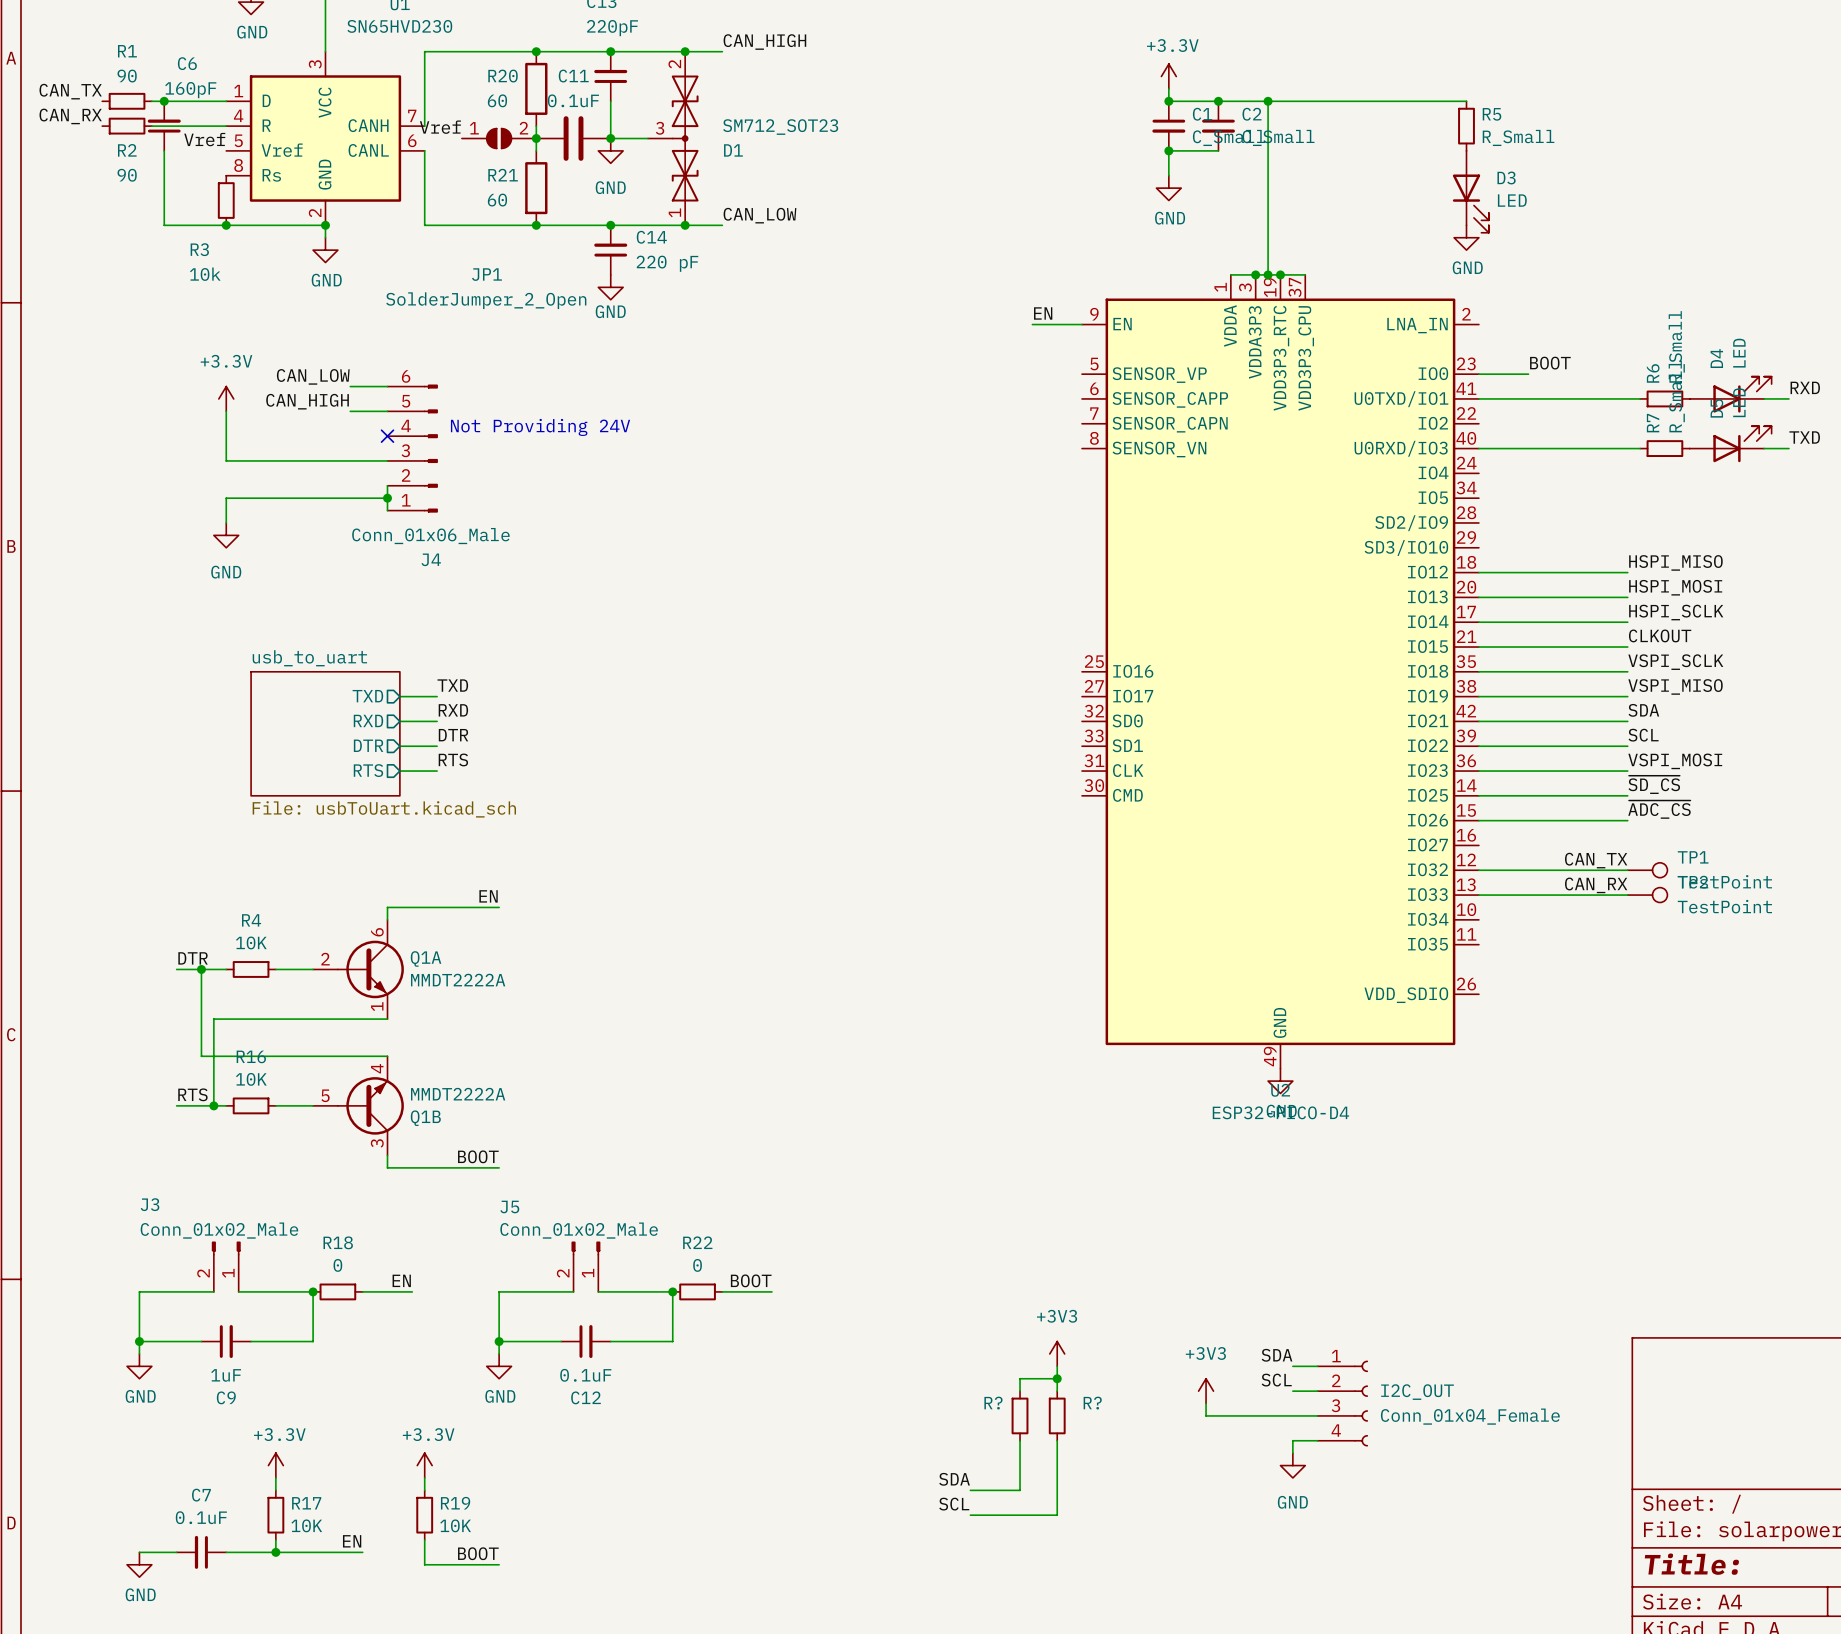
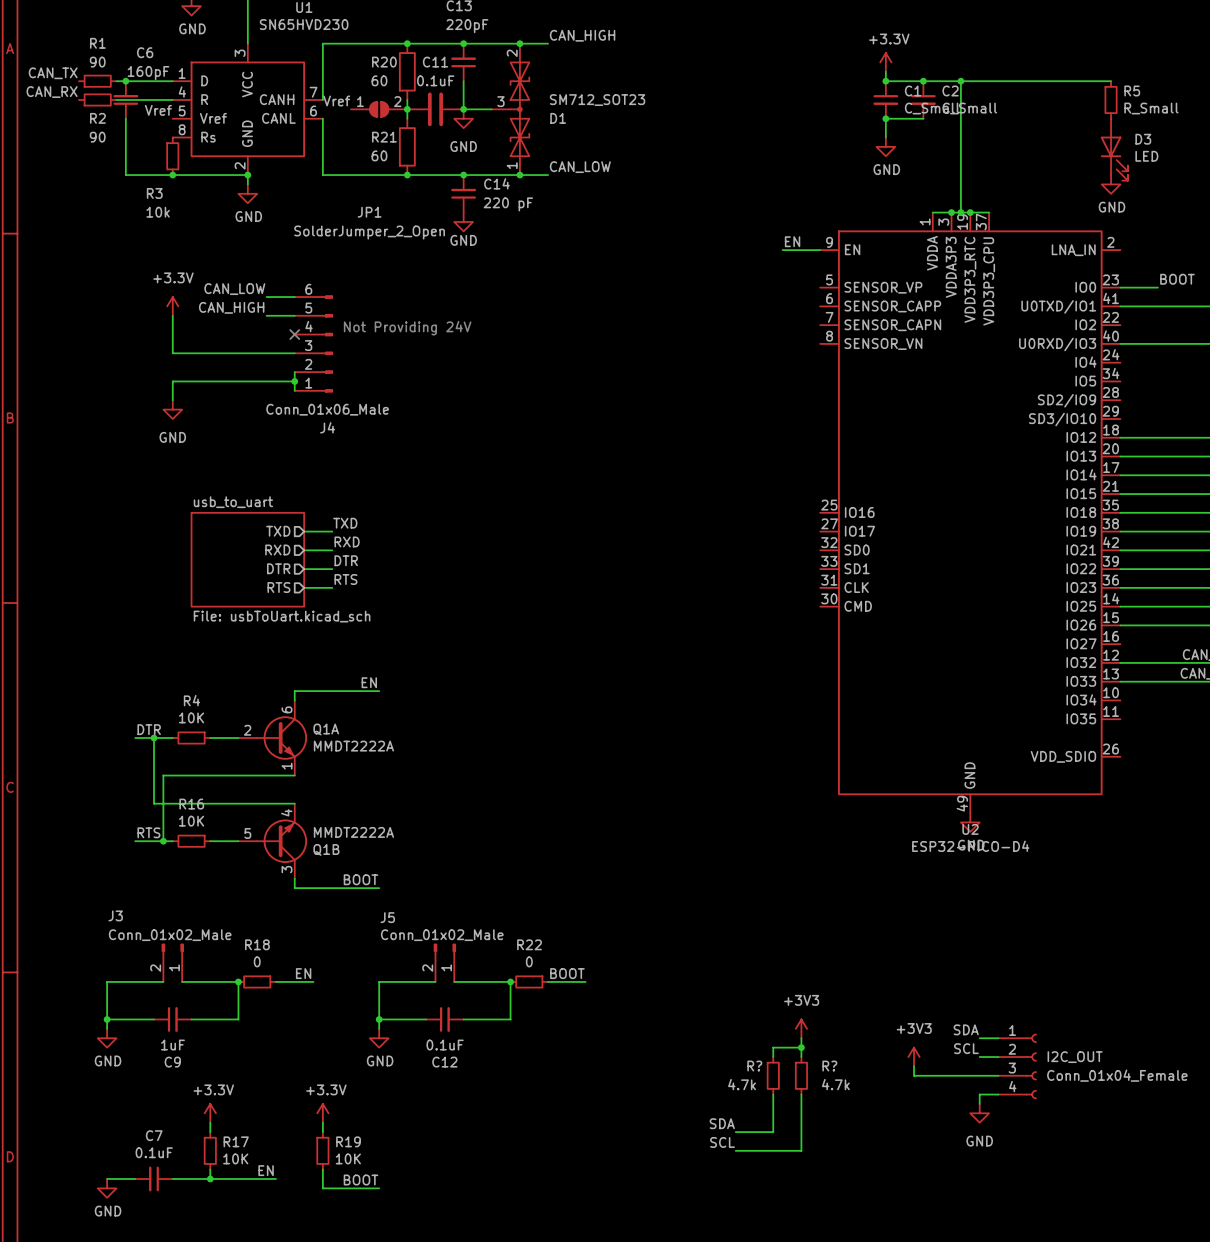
R? value: none -> 4.7k (742, 1084)
R? value: none -> 4.7k (835, 1084)

